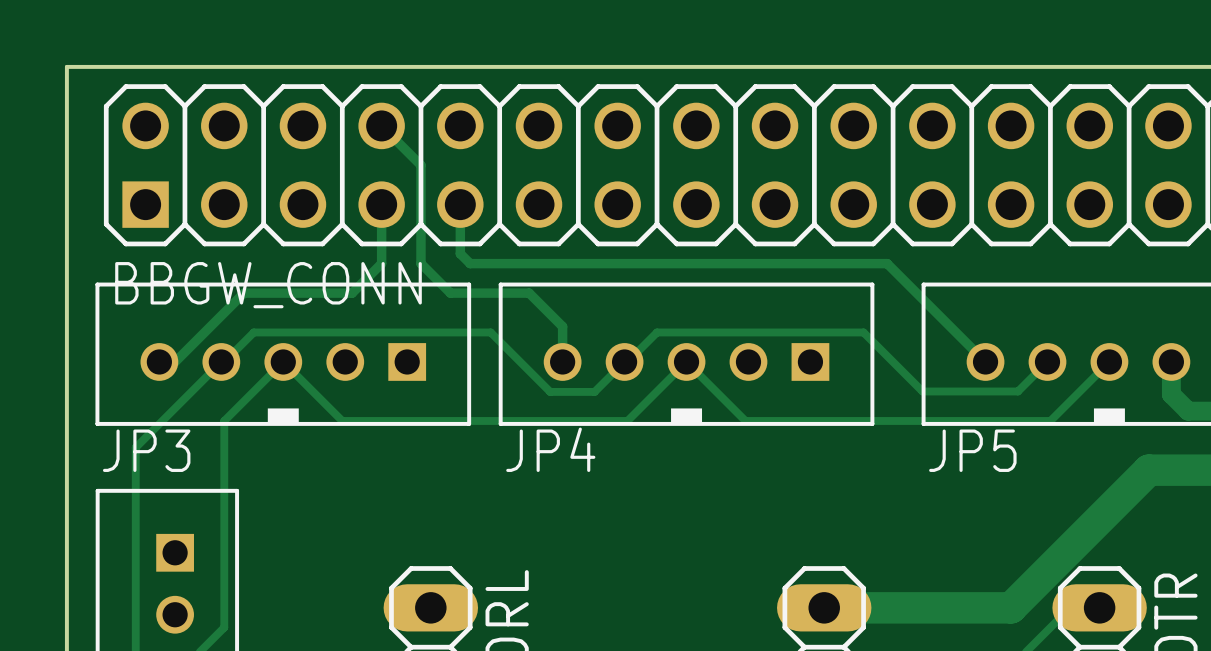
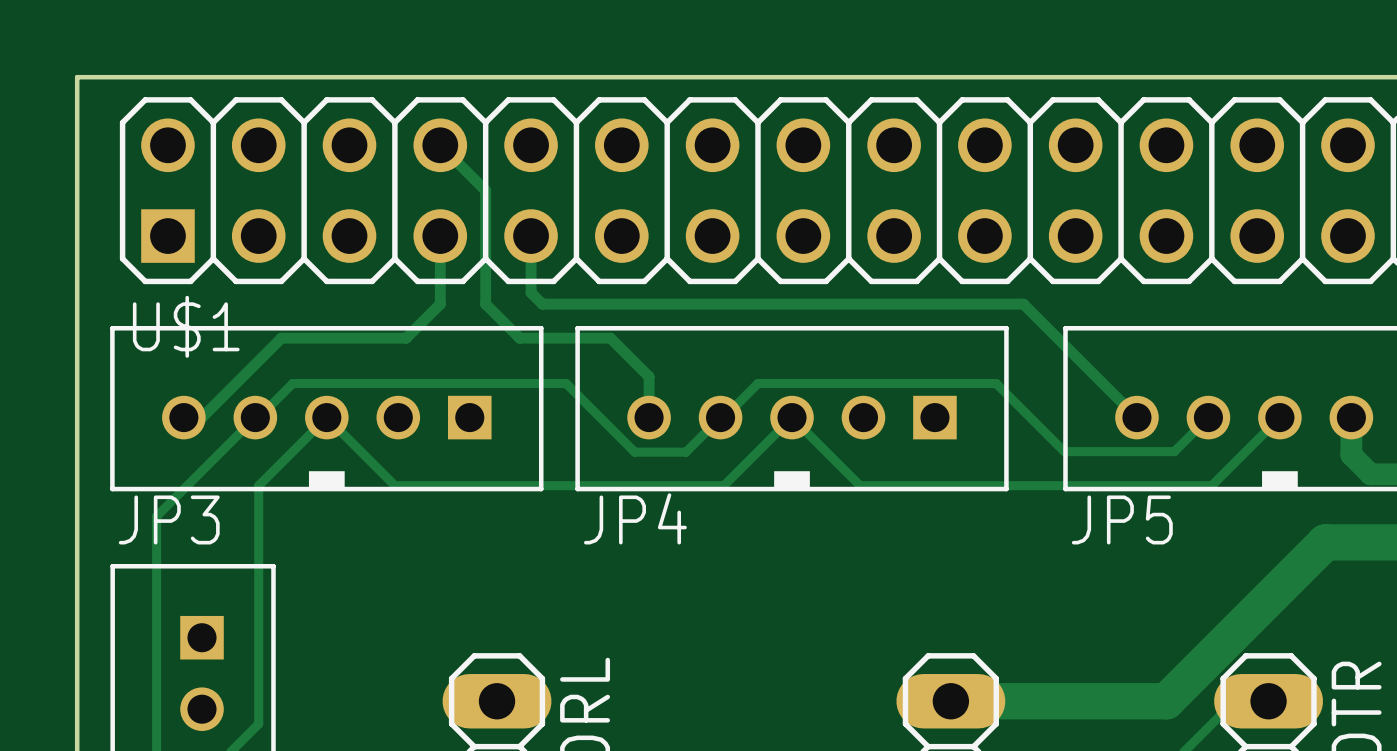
BBGW_CONN name: BBGW_CONN (268, 285) -> U$1 (186, 326)

